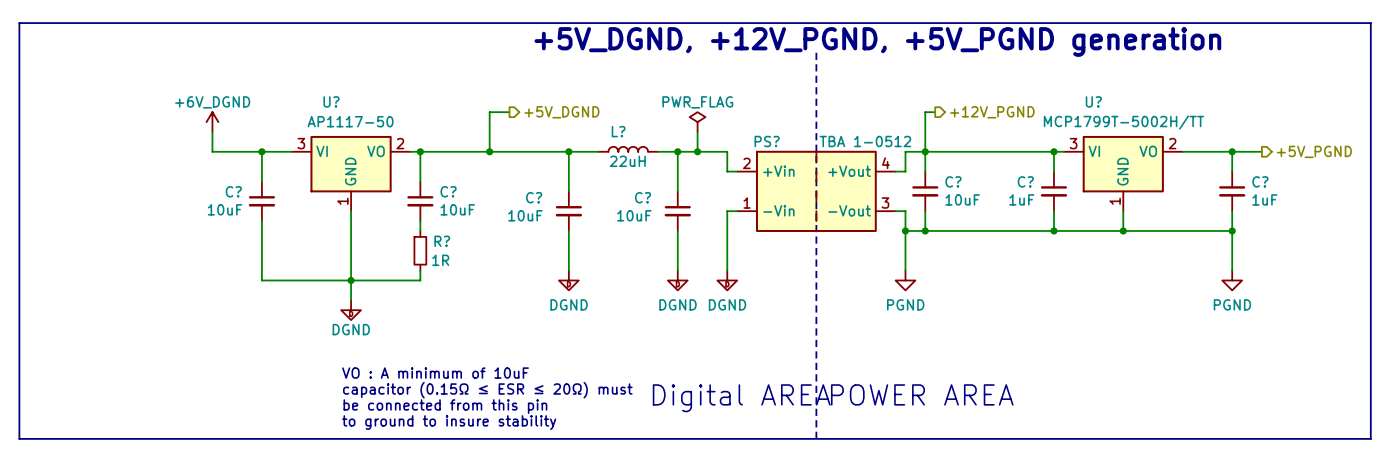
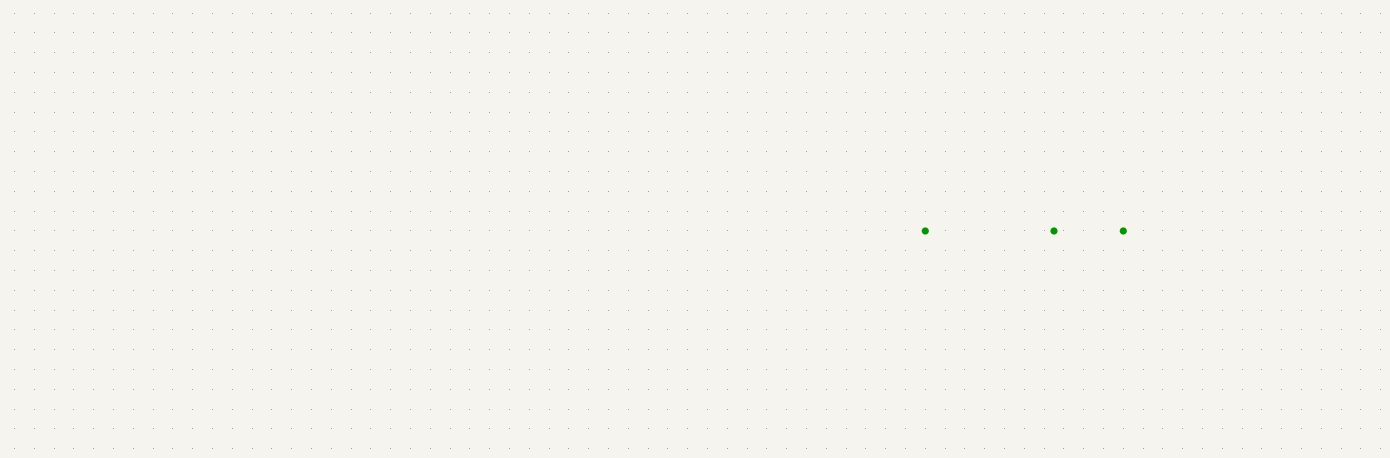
line: (19, 23) (1370, 23) (1370, 438) (19, 438) (19, 23) -> none
text: +5V_DGND, +12V_PGND, +5V_PGND generation (877, 41) -> none
line: (816, 52) (816, 438) -> none
wire: (509, 112) (489, 112) (489, 151) -> none
hierarchical label: +5V_DGND (561, 112) -> none
wire: (935, 112) (925, 112) (925, 171) -> none
hierarchical label: +12V_PGND (992, 112) -> none
power symbol: +6V_DGND (212, 122) -> none
power symbol: PWR_FLAG (697, 122) -> none
wire: (212, 131) (212, 151) (291, 151) -> none
wire: (697, 131) (697, 151) -> none
L?: 22uH (628, 149) -> none
wire: (261, 151) (261, 181) -> none
junction: (261, 151) -> none
wire: (410, 151) (598, 151) -> none
wire: (420, 151) (420, 181) -> none
junction: (420, 151) -> none
junction: (489, 151) -> none
wire: (568, 151) (568, 191) -> none
junction: (568, 151) -> none
wire: (657, 151) (727, 151) (727, 171) (737, 171) -> none
wire: (677, 151) (677, 191) -> none
junction: (677, 151) -> none
junction: (697, 151) -> none
junction: (925, 151) -> none
wire: (1053, 151) (1053, 171) -> none
junction: (1053, 151) -> none
wire: (1063, 151) (905, 151) (905, 171) (895, 171) -> none
wire: (1182, 151) (1261, 151) -> none
wire: (1232, 151) (1232, 171) -> none
junction: (1232, 151) -> none
hierarchical label: +5V_PGND (1314, 151) -> none
U?: AP1117-50 (351, 173) -> none
U?: MCP1799T-5002H/TT (1123, 173) -> none
PS?: TBA 1-0512 (816, 191) -> none
C?: 10uF (925, 191) -> none
C?: 1uF (1053, 191) -> none
C?: 1uF (1232, 191) -> none
C?: 10uF (261, 201) -> none
C?: 10uF (420, 201) -> none
wire: (351, 211) (351, 300) -> none
C?: 10uF (568, 211) -> none
C?: 10uF (677, 211) -> none
wire: (737, 211) (727, 211) (727, 270) -> none
wire: (895, 211) (905, 211) (905, 270) -> none
wire: (925, 211) (925, 230) -> none
wire: (1053, 211) (1053, 230) -> none
wire: (1123, 211) (1123, 230) -> none
wire: (1232, 211) (1232, 270) -> none
wire: (261, 221) (261, 280) (420, 280) (420, 270) -> none
wire: (420, 221) (420, 230) -> none
wire: (568, 230) (568, 270) -> none
wire: (677, 230) (677, 270) -> none
wire: (905, 230) (1232, 230) -> none
junction: (905, 230) -> none
junction: (1232, 230) -> none
R?: 1R (420, 250) -> none
junction: (351, 280) -> none
power symbol: DGND (568, 280) -> none
power symbol: DGND (677, 280) -> none
power symbol: DGND (727, 280) -> none
power symbol: PGND (905, 280) -> none
power symbol: PGND (1232, 280) -> none
power symbol: DGND (351, 310) -> none
text: VO : A minimum of 10uF (435, 373) -> none
text: capacitor (0.15Ω ≤ ESR ≤ 20Ω) must (487, 390) -> none
text: POWER AREA (922, 394) -> none
text: Digital AREA (741, 398) -> none
text: be connected from this pin (445, 406) -> none
text: to ground to insure stability (449, 422) -> none

